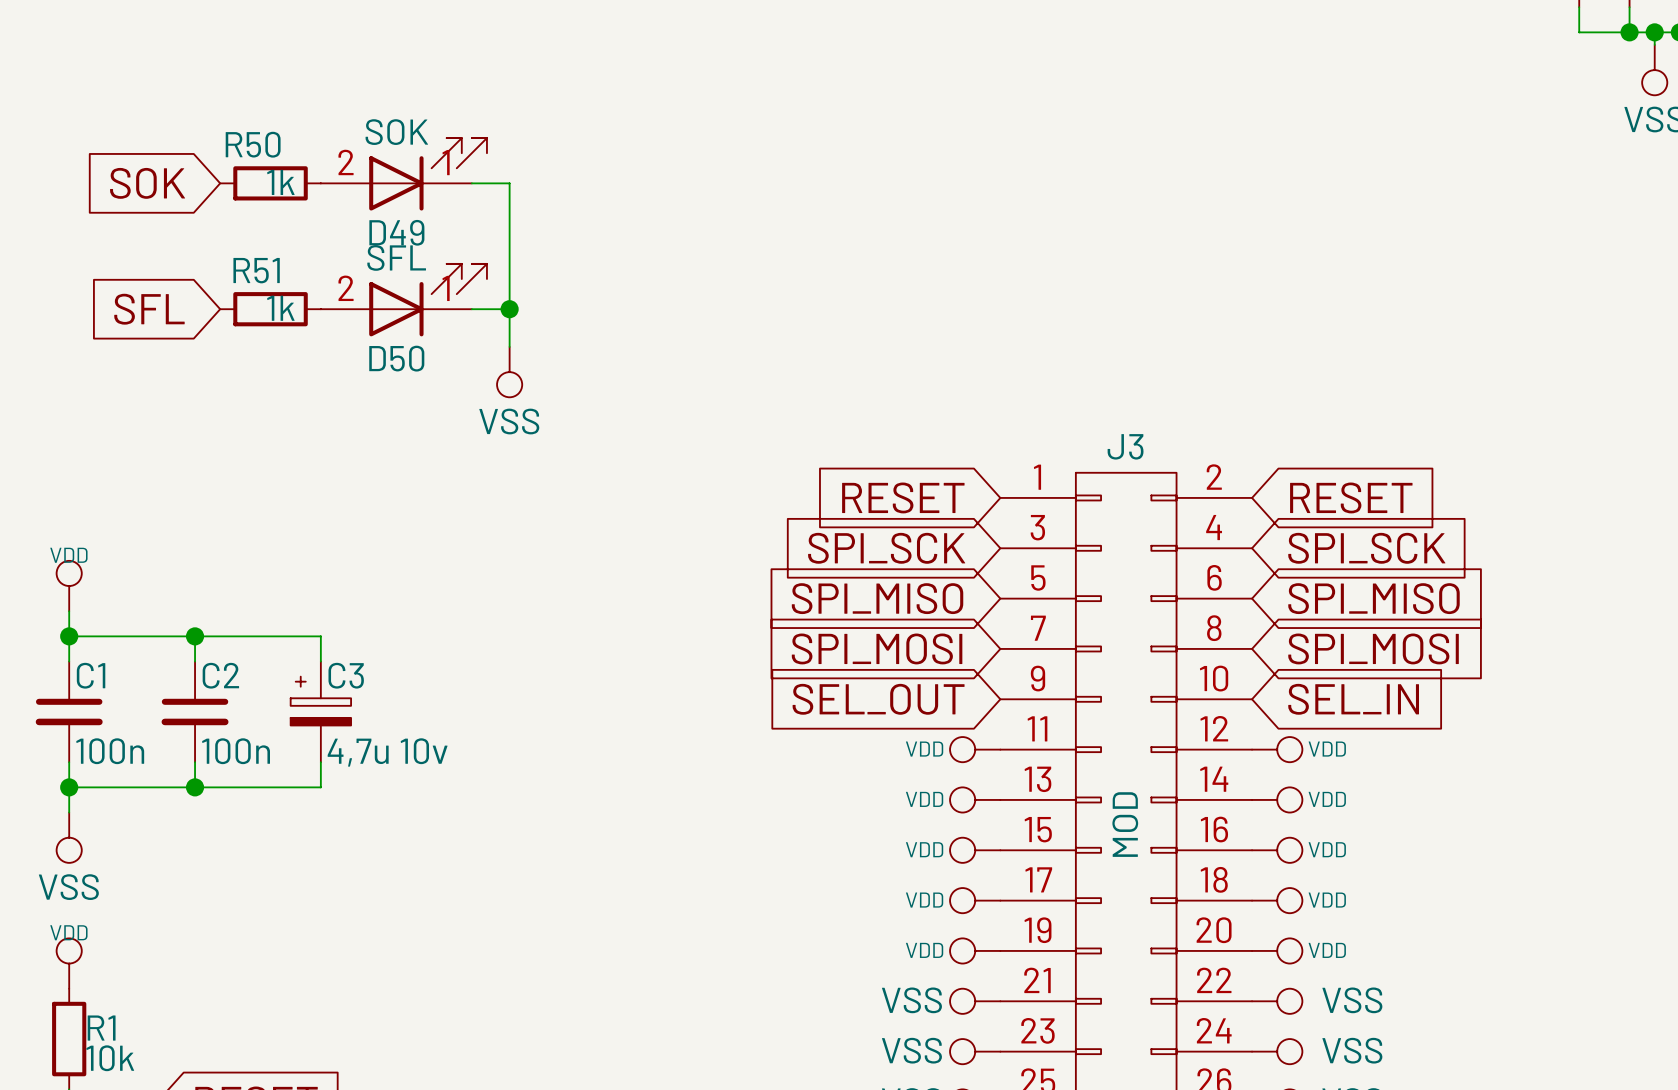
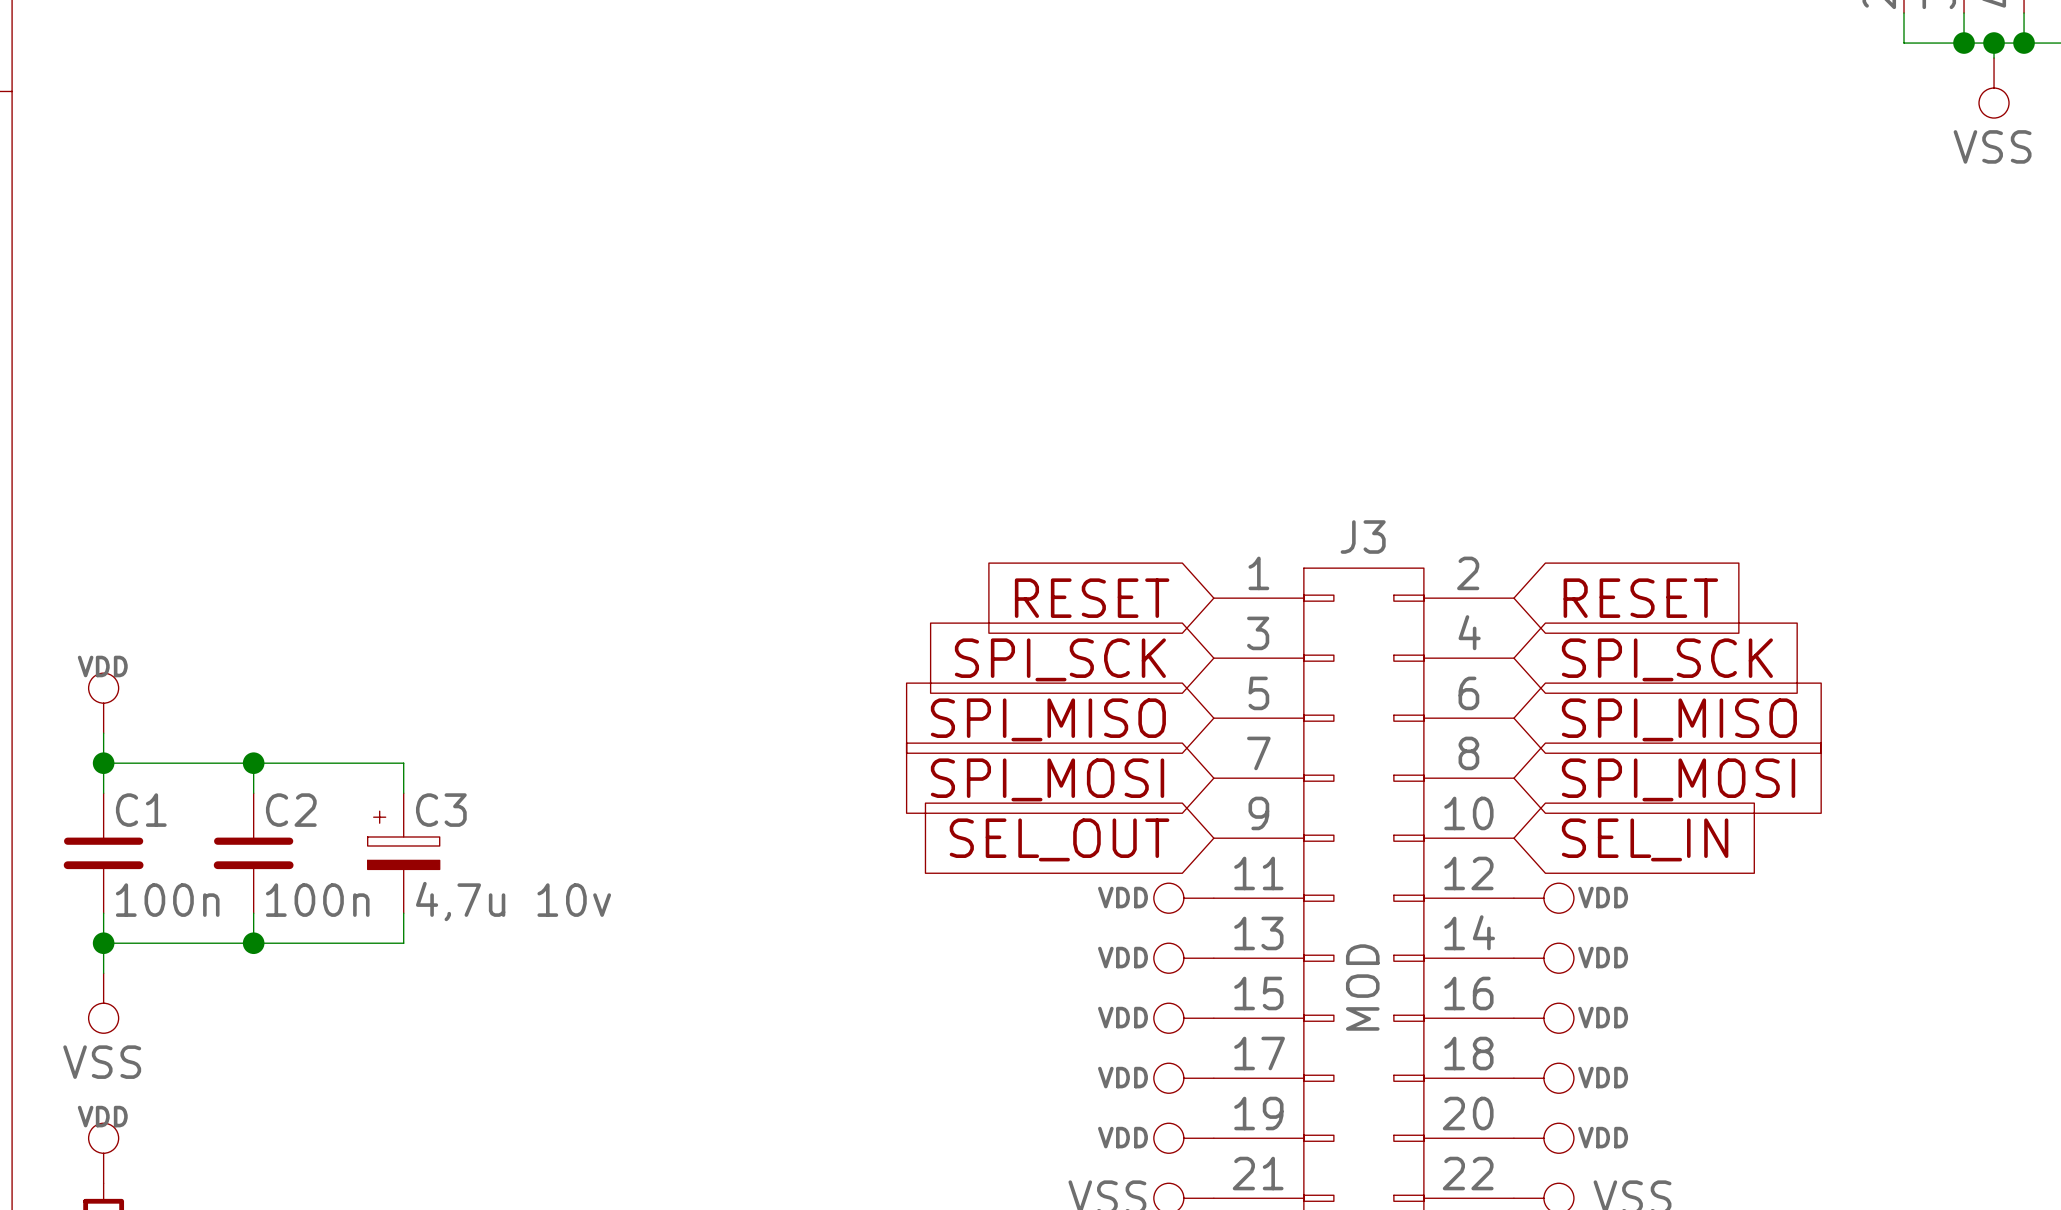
D49: SOK (403, 174) -> none
global label: SOK (147, 183) -> none
R50: 1k (270, 183) -> none
wire: (471, 183) (509, 183) (509, 346) -> none
D50: SFL (403, 300) -> none
global label: SFL (149, 309) -> none
R51: 1k (270, 309) -> none
wire: (471, 309) (509, 309) -> none
junction: (509, 309) -> none
power symbol: VSS (509, 372) -> none

